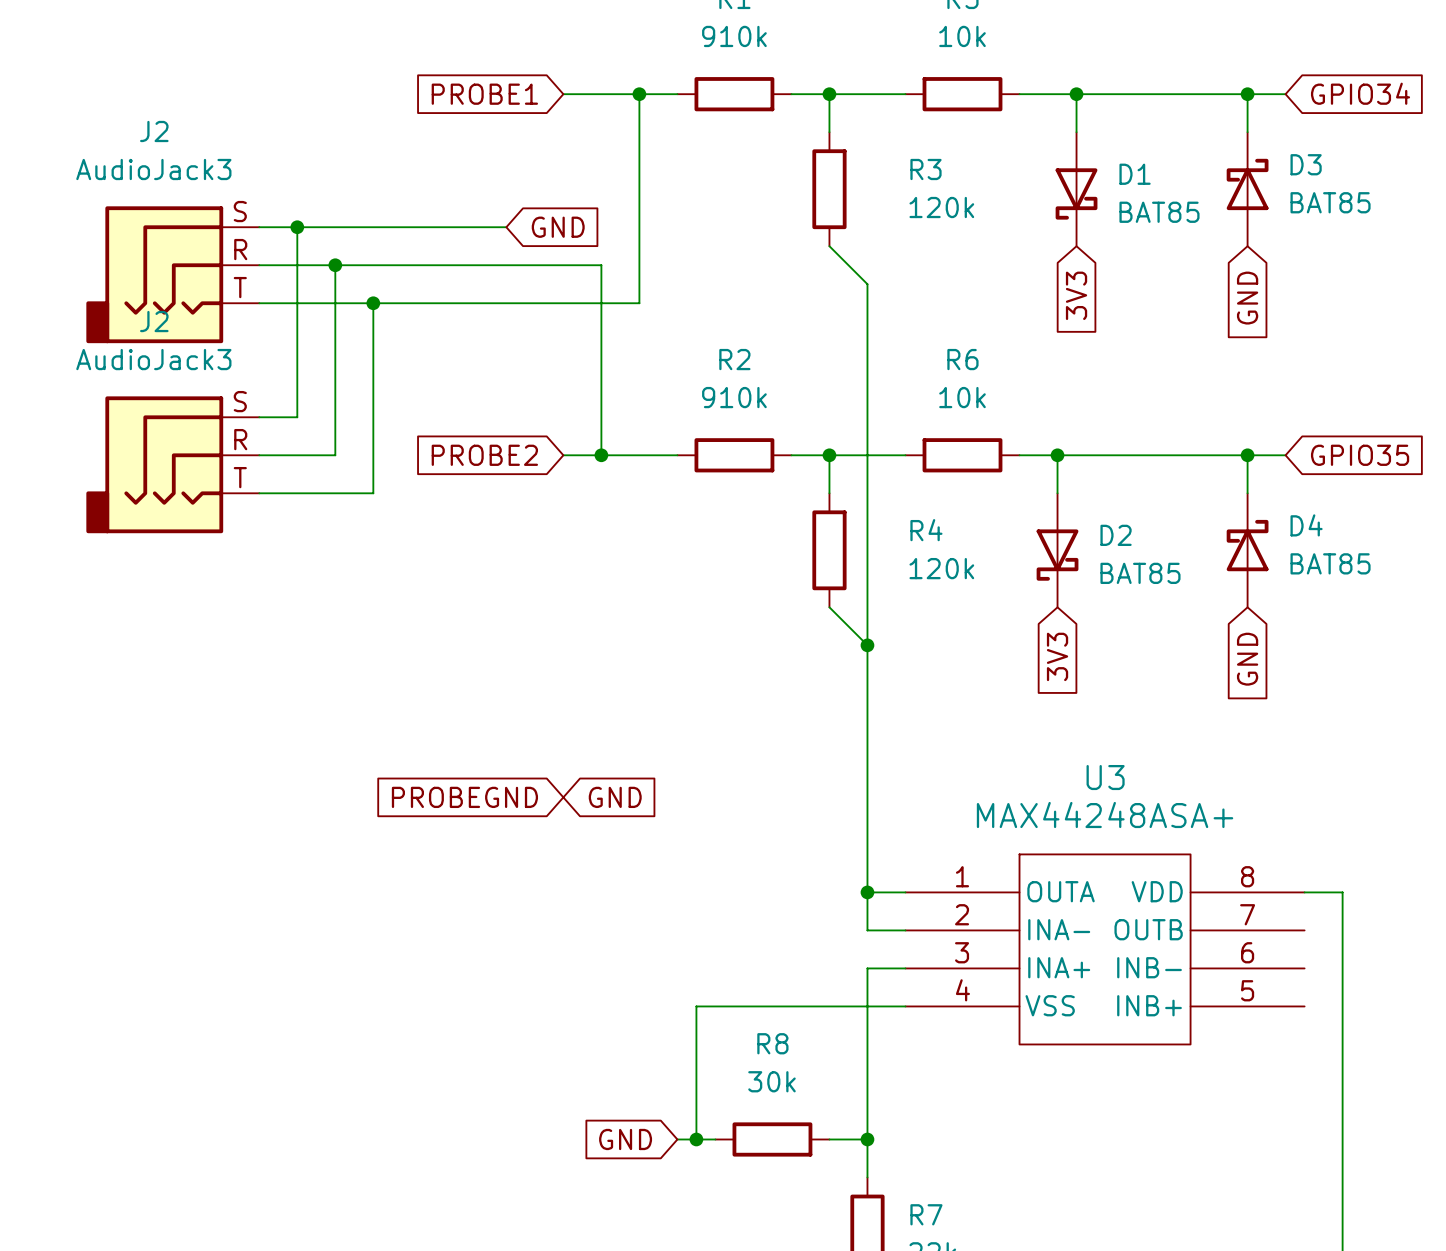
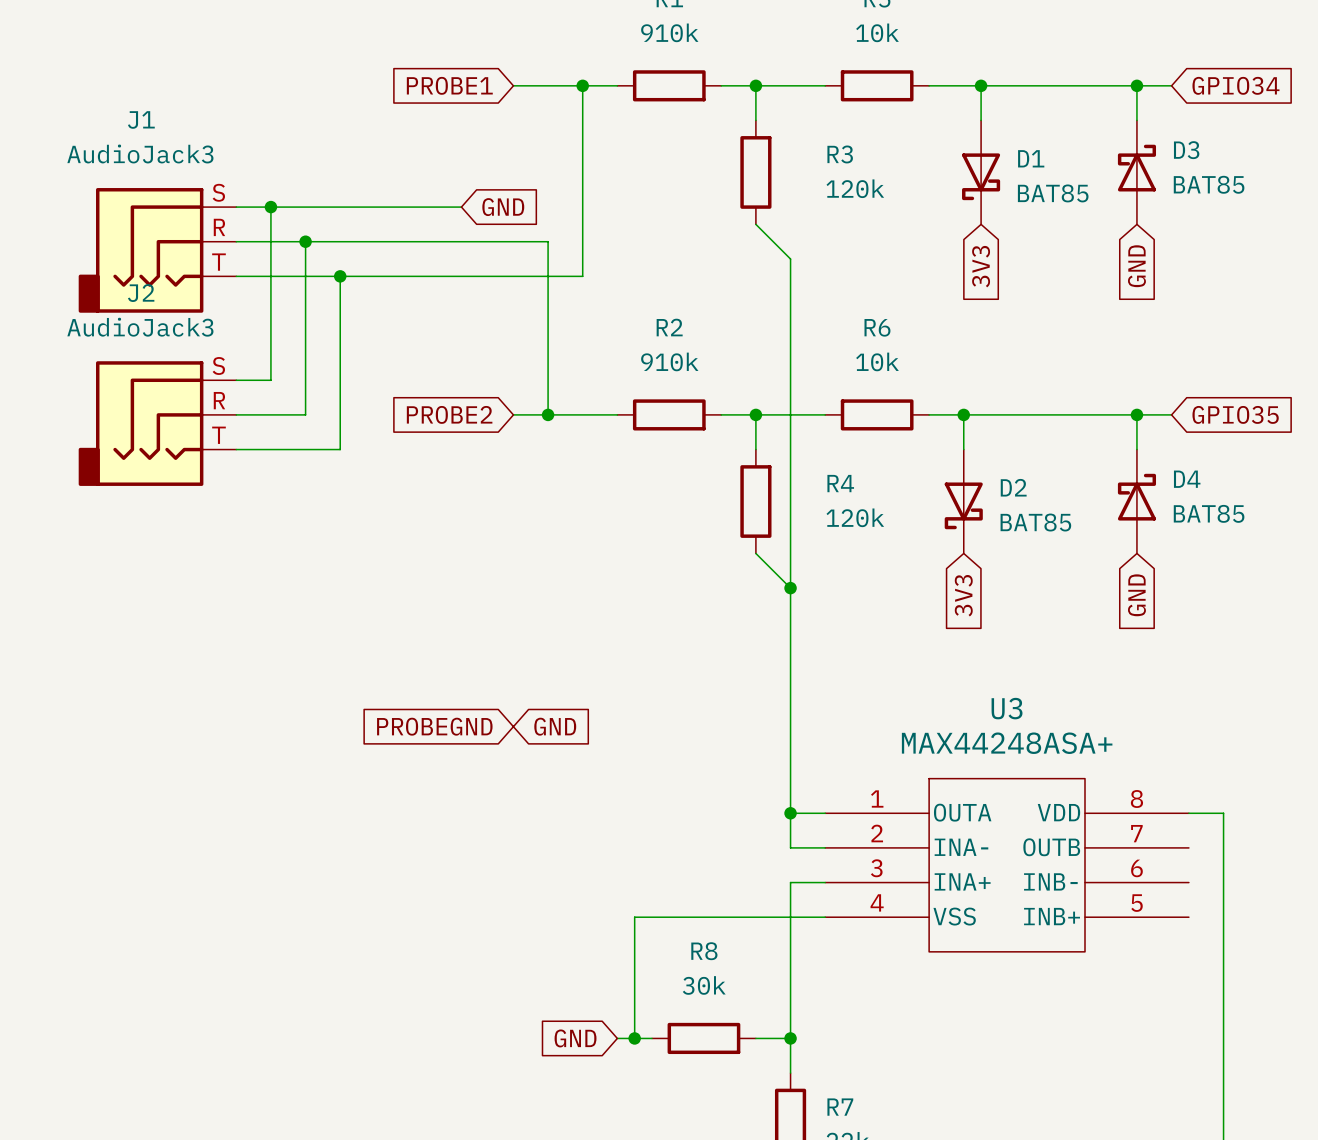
J2 name: J2 (154, 131) -> J1 (141, 119)

